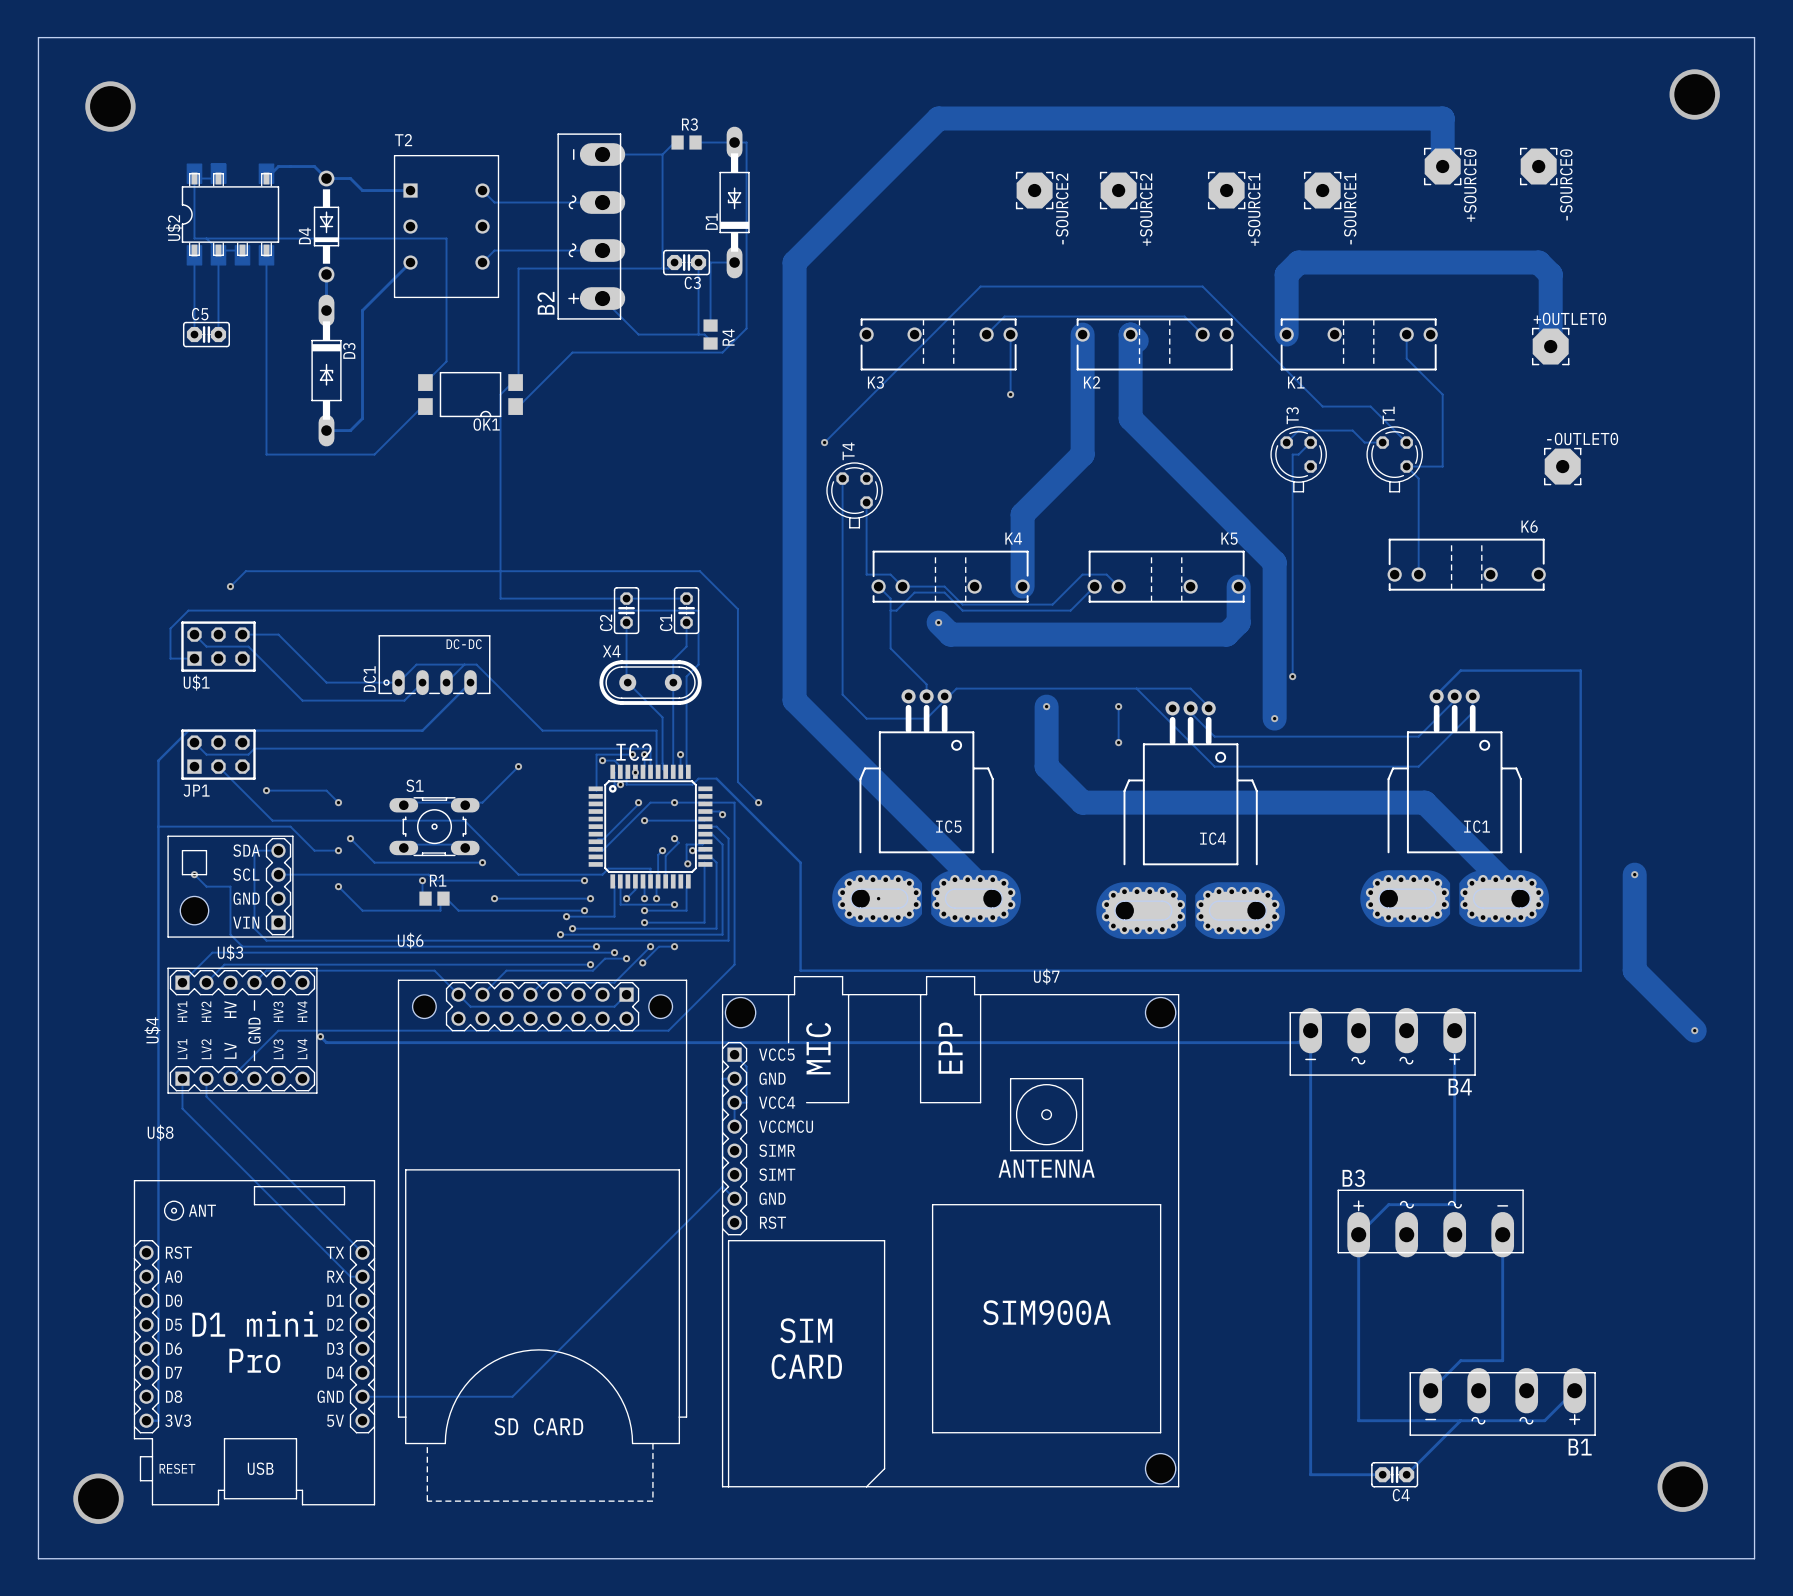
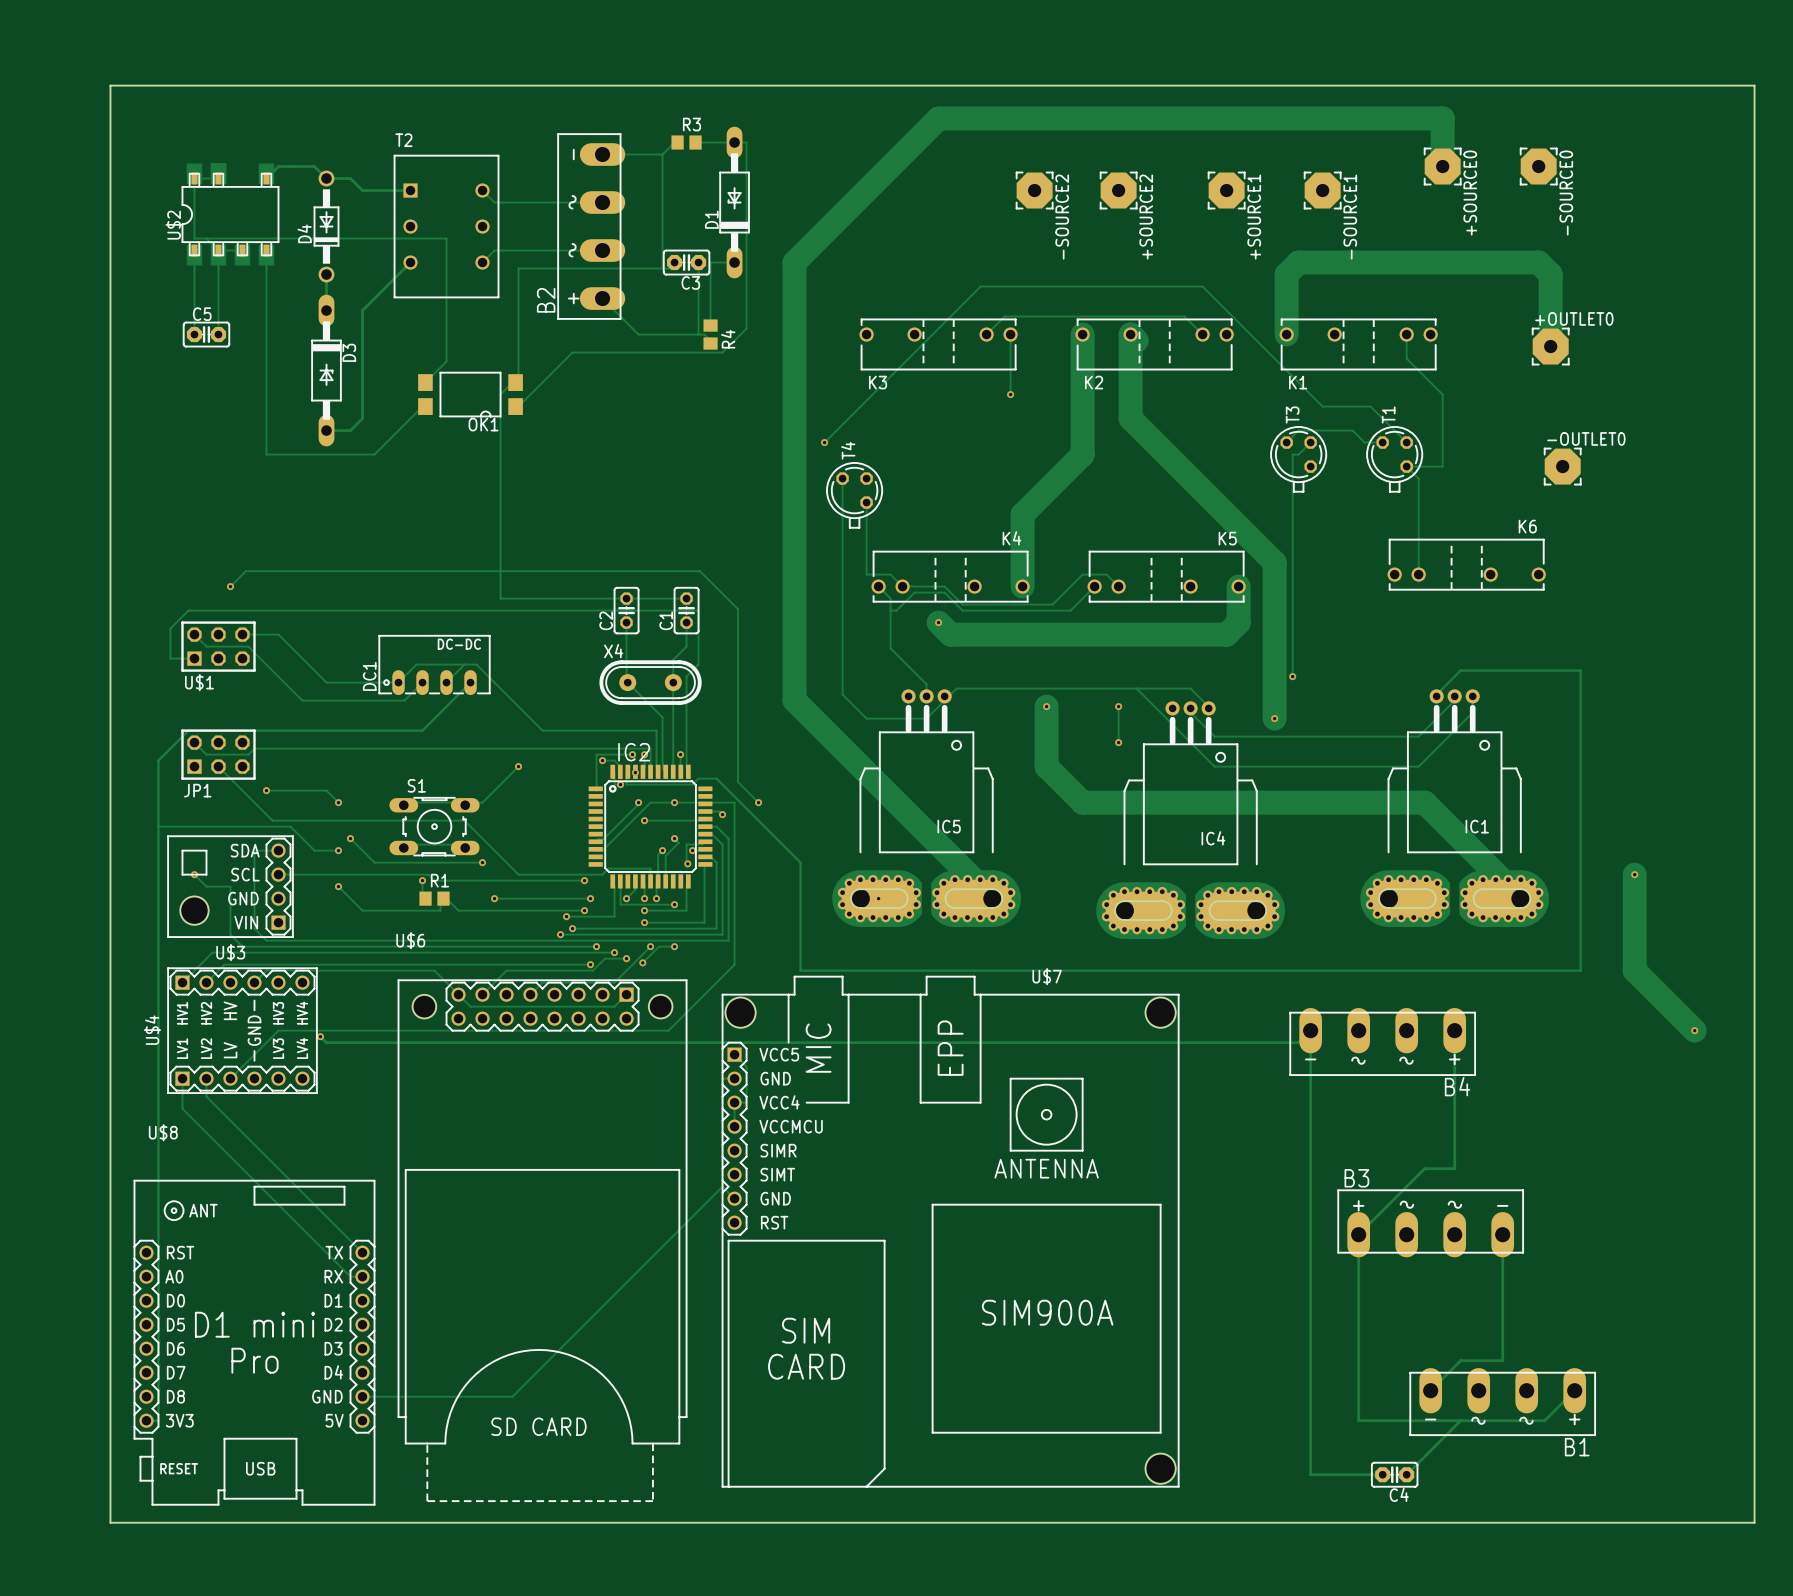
board edge: (1754, 85) (1754, 37) (38, 37) (38, 1558) (1754, 1558) (1754, 1522) -> (1754, 85) (110, 85) (110, 1522) (1754, 1522)
via: (1694, 94) -> none
via: (110, 106) -> none
track: (1454, 1168) (1454, 1204) (1388, 1204) -> (1454, 1168) (1424, 1168) (1388, 1204)
via: (1682, 1486) -> none
via: (98, 1498) -> none

